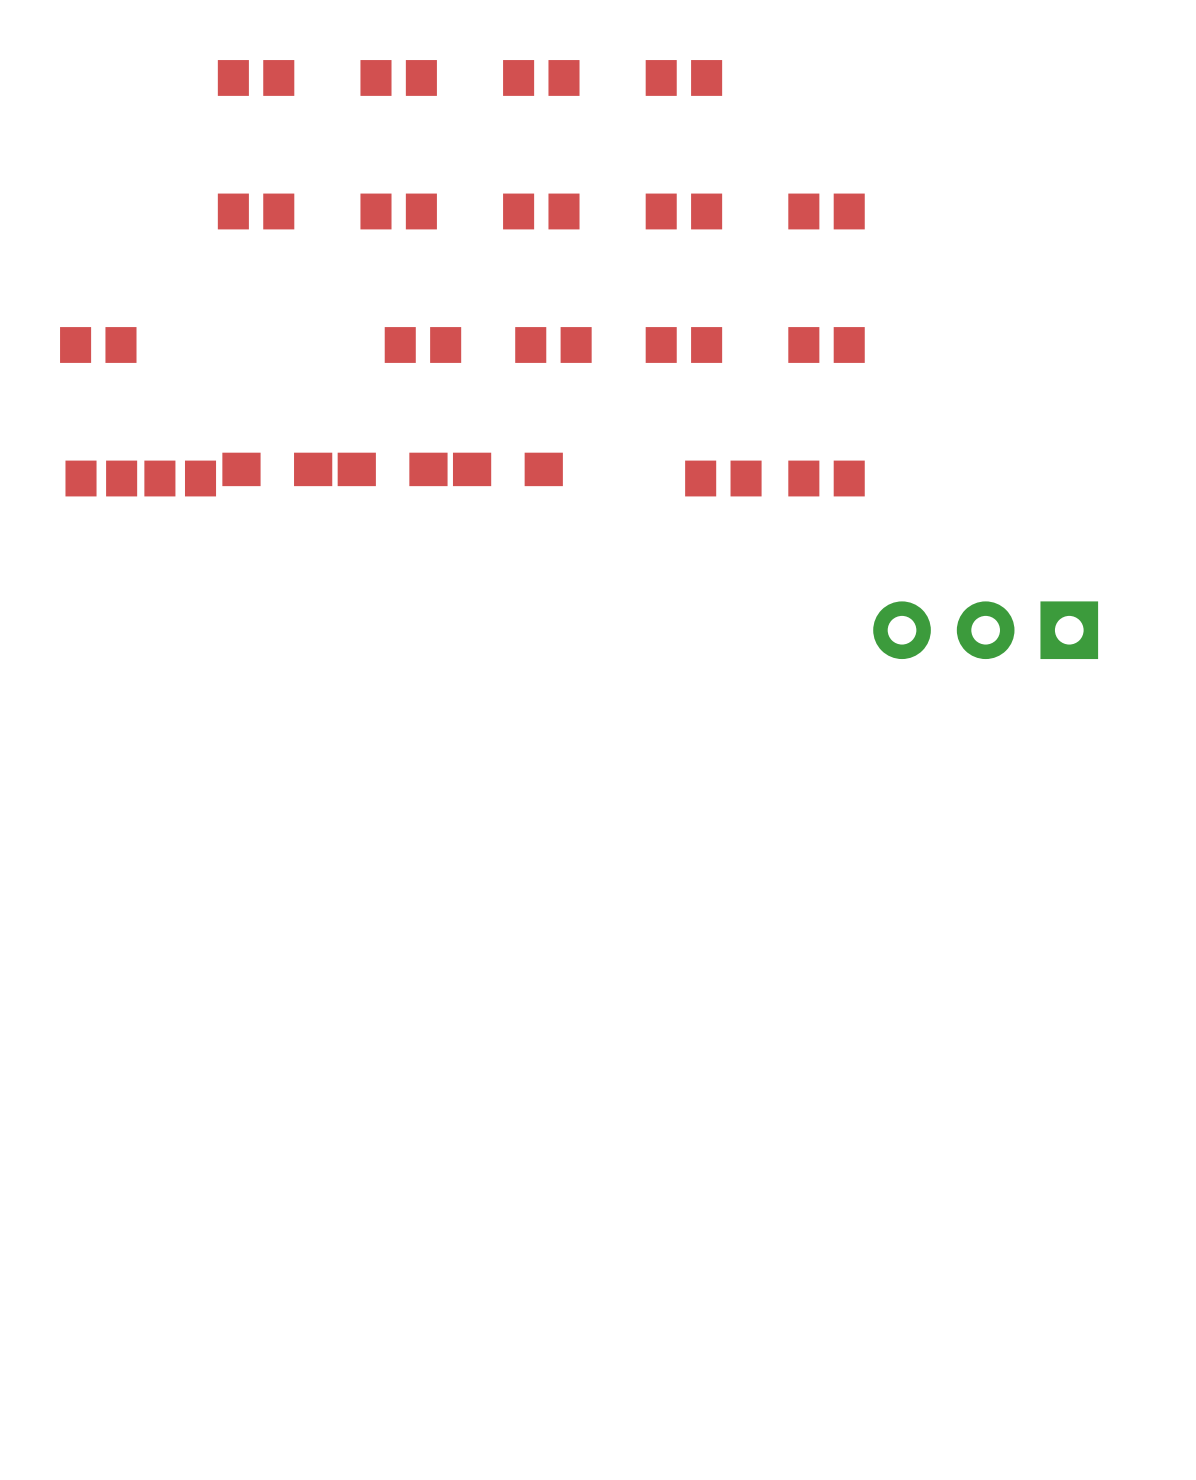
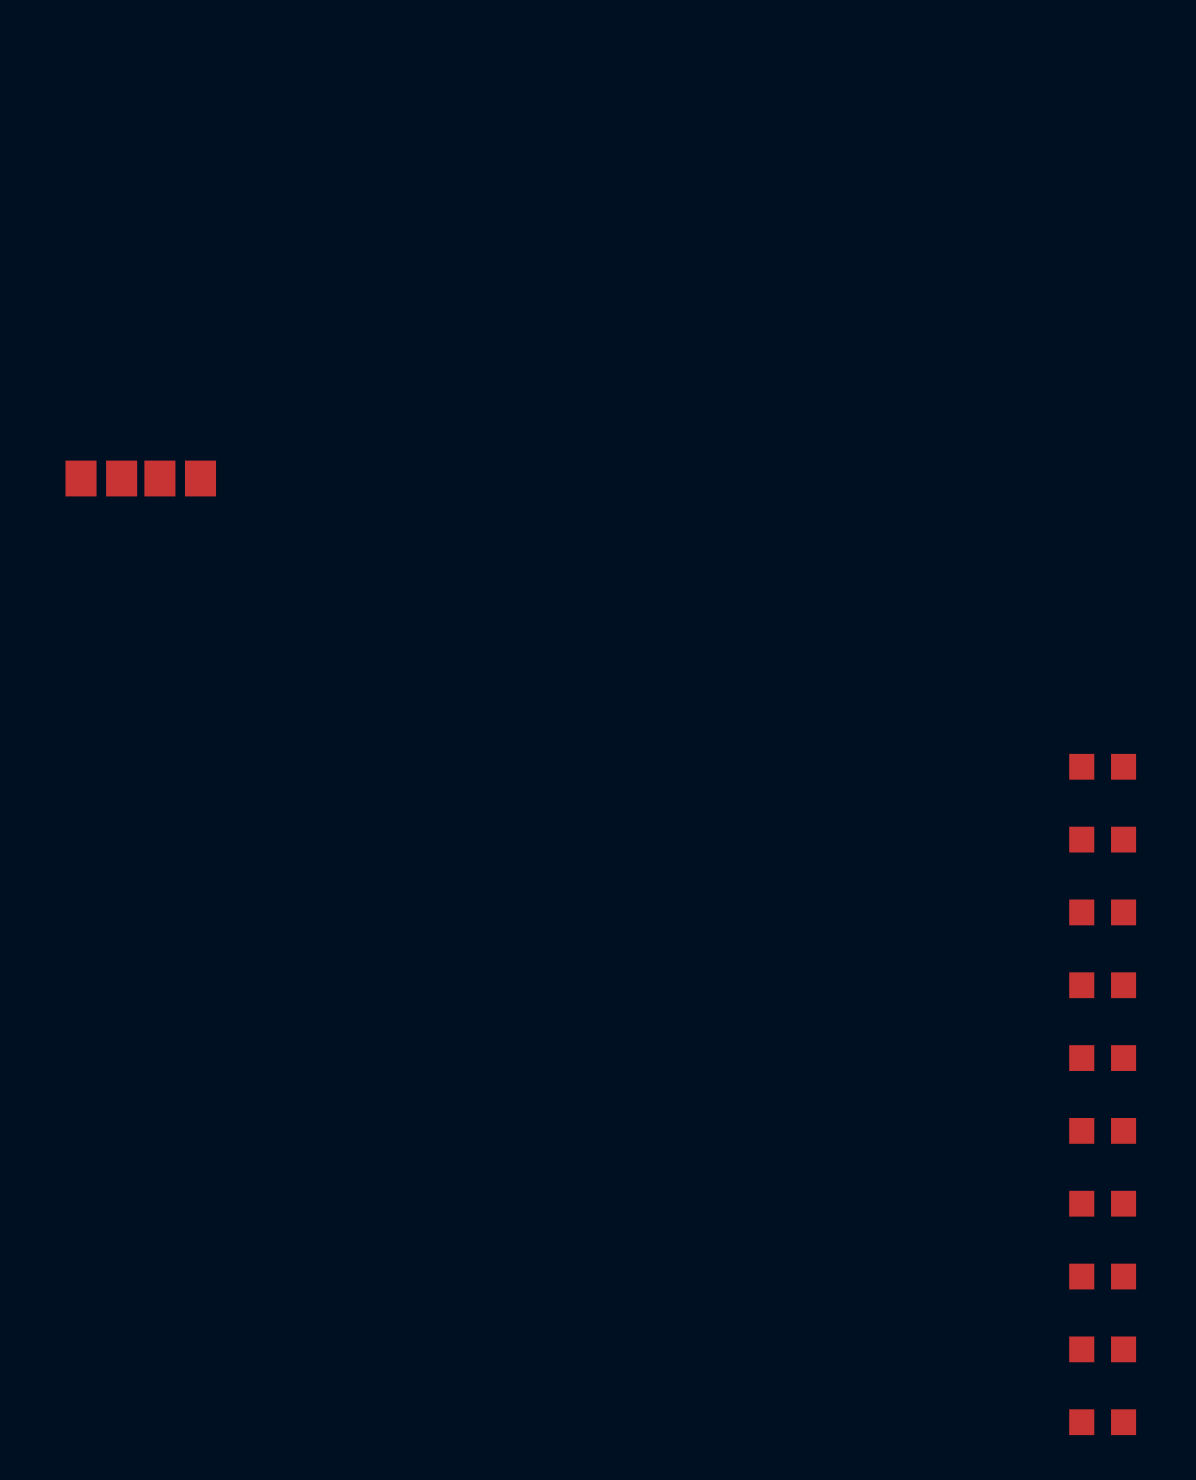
part: (256, 77) -> none
part: (398, 77) -> none
part: (541, 77) -> none
part: (683, 77) -> none
part: (256, 211) -> none
part: (398, 211) -> none
part: (541, 211) -> none
part: (683, 211) -> none
part: (826, 211) -> none
part: (98, 344) -> none
part: (422, 344) -> none
part: (553, 344) -> none
part: (683, 344) -> none
part: (826, 344) -> none
part: (277, 469) -> none
part: (392, 469) -> none
part: (507, 469) -> none
part: (723, 478) -> none
part: (826, 478) -> none
part: (985, 630) -> none
part: none -> (1102, 766)
part: none -> (1102, 839)
part: none -> (1102, 912)
part: none -> (1102, 985)
part: none -> (1102, 1058)
part: none -> (1102, 1130)
part: none -> (1102, 1203)
part: none -> (1102, 1276)
part: none -> (1102, 1349)
part: none -> (1102, 1422)

